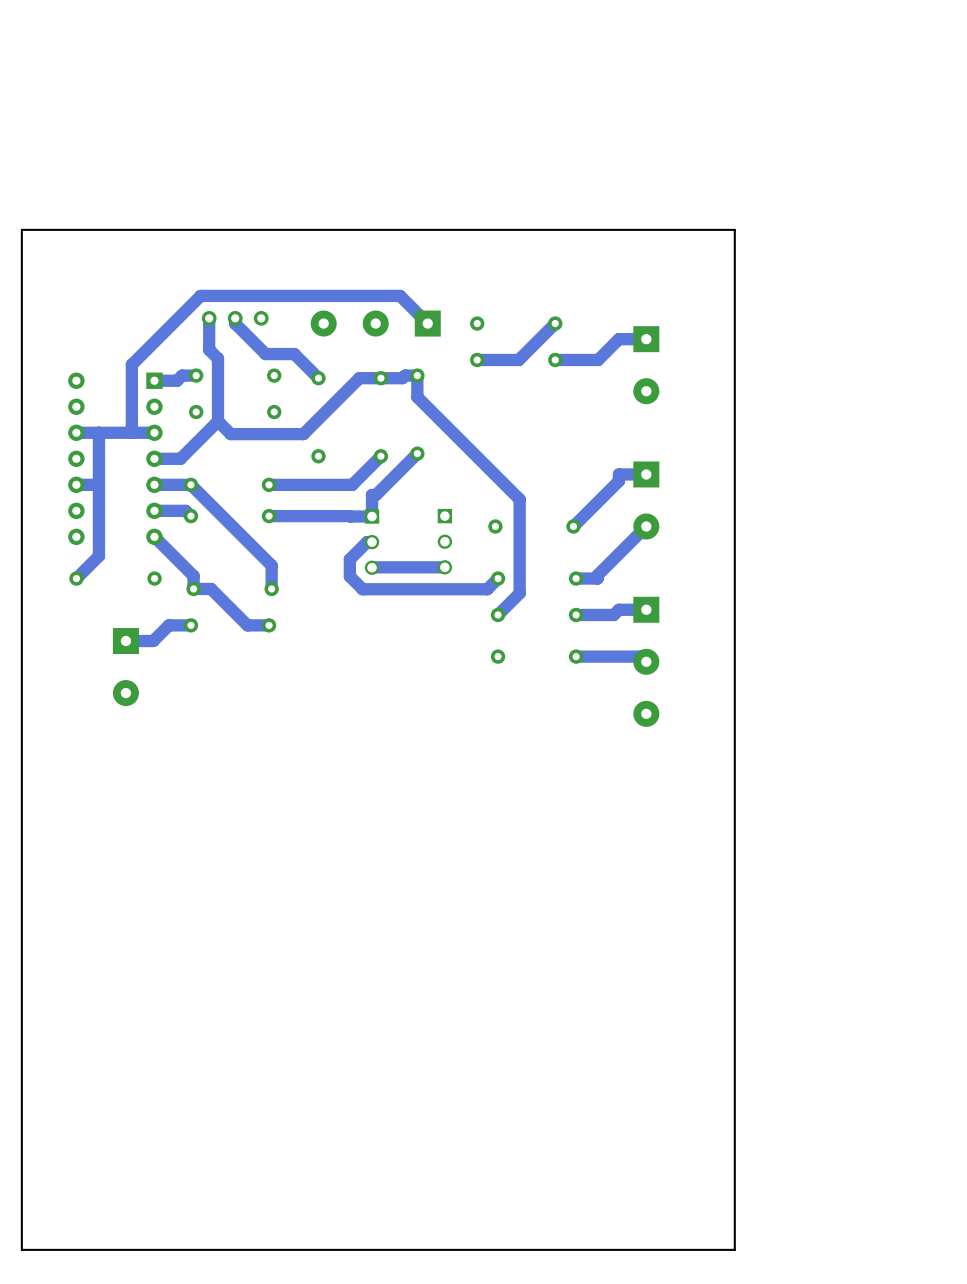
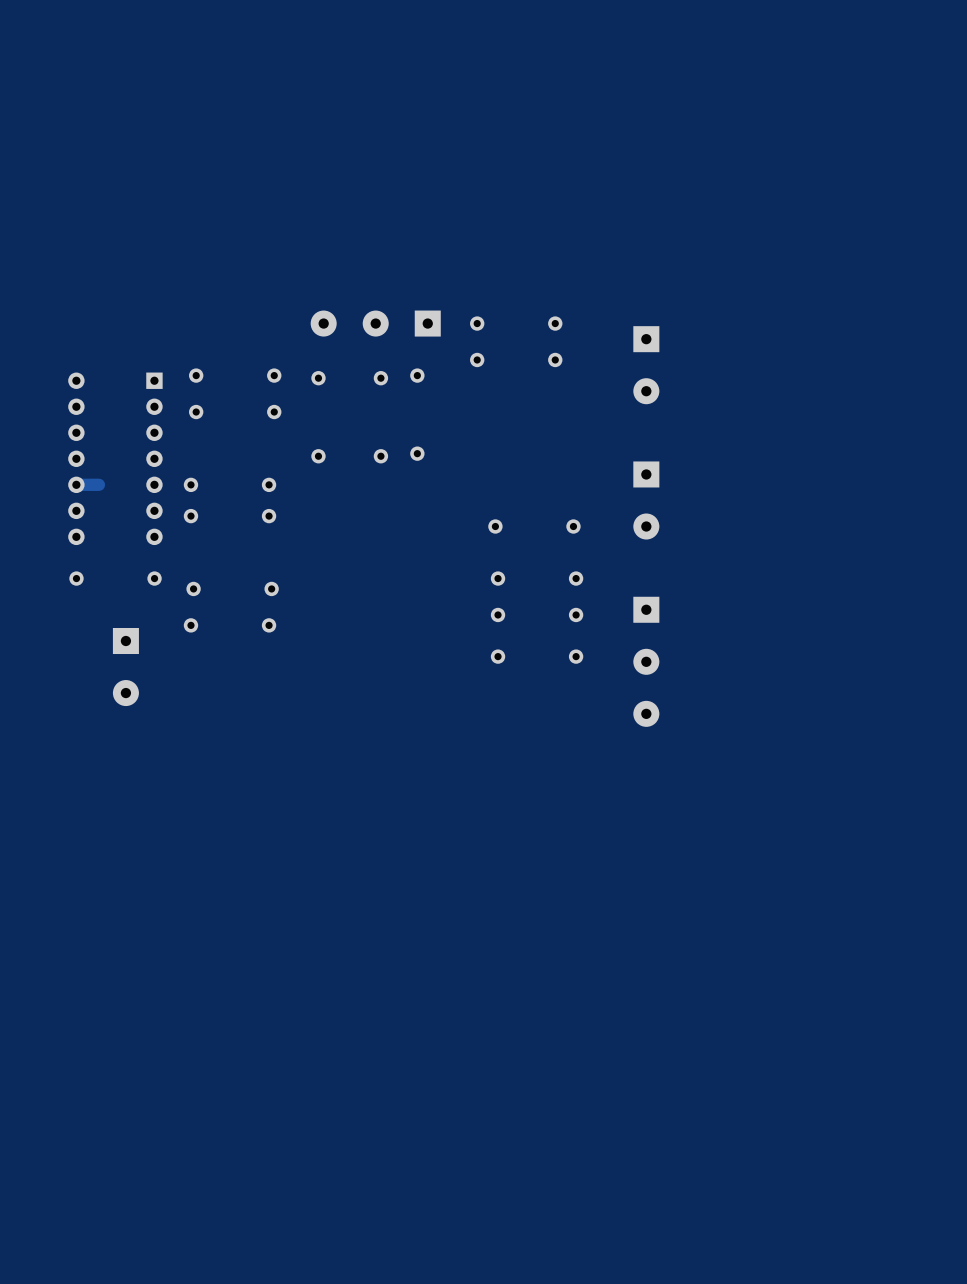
board edge: (734, 229) (21, 229) (21, 1249) (734, 1249) (734, 229) -> none
track: (209, 318) (209, 349) (218, 358) (218, 421) -> none
track: (235, 318) (235, 323) (265, 354) (294, 354) (318, 378) -> none
part: (235, 318) -> none
track: (427, 323) (400, 295) (200, 295) (131, 364) (131, 432) -> none
track: (555, 323) (518, 359) (477, 359) -> none
track: (646, 339) (618, 339) (598, 359) (555, 359) -> none
track: (196, 375) (182, 375) (177, 380) (154, 380) -> none
track: (218, 421) (230, 434) (303, 434) (359, 378) (402, 378) (405, 375) (417, 375) (417, 397) (519, 499) (519, 593) (498, 614) -> none
track: (218, 421) (180, 458) (154, 458) -> none
track: (98, 432) (98, 556) (76, 578) -> none
track: (154, 432) (76, 432) -> none
track: (417, 453) (376, 494) (372, 494) (372, 516) (269, 516) -> none
track: (380, 456) (352, 484) (269, 484) -> none
track: (646, 474) (618, 474) (618, 481) (573, 526) -> none
track: (154, 484) (190, 484) (271, 565) (271, 588) -> none
track: (154, 510) (185, 510) (190, 516) -> none
track: (646, 526) (597, 575) (597, 578) (576, 578) -> none
track: (154, 536) (193, 576) (193, 588) (211, 588) (247, 625) (269, 625) -> none
part: (444, 541) -> none
track: (372, 542) (367, 542) (349, 559) (349, 576) (362, 589) (487, 589) (498, 578) -> none
part: (372, 542) -> none
track: (444, 567) (372, 567) -> none
track: (646, 609) (618, 609) (613, 614) (576, 614) -> none
track: (190, 625) (168, 625) (153, 641) (125, 641) -> none
track: (576, 656) (641, 656) (646, 661) -> none

